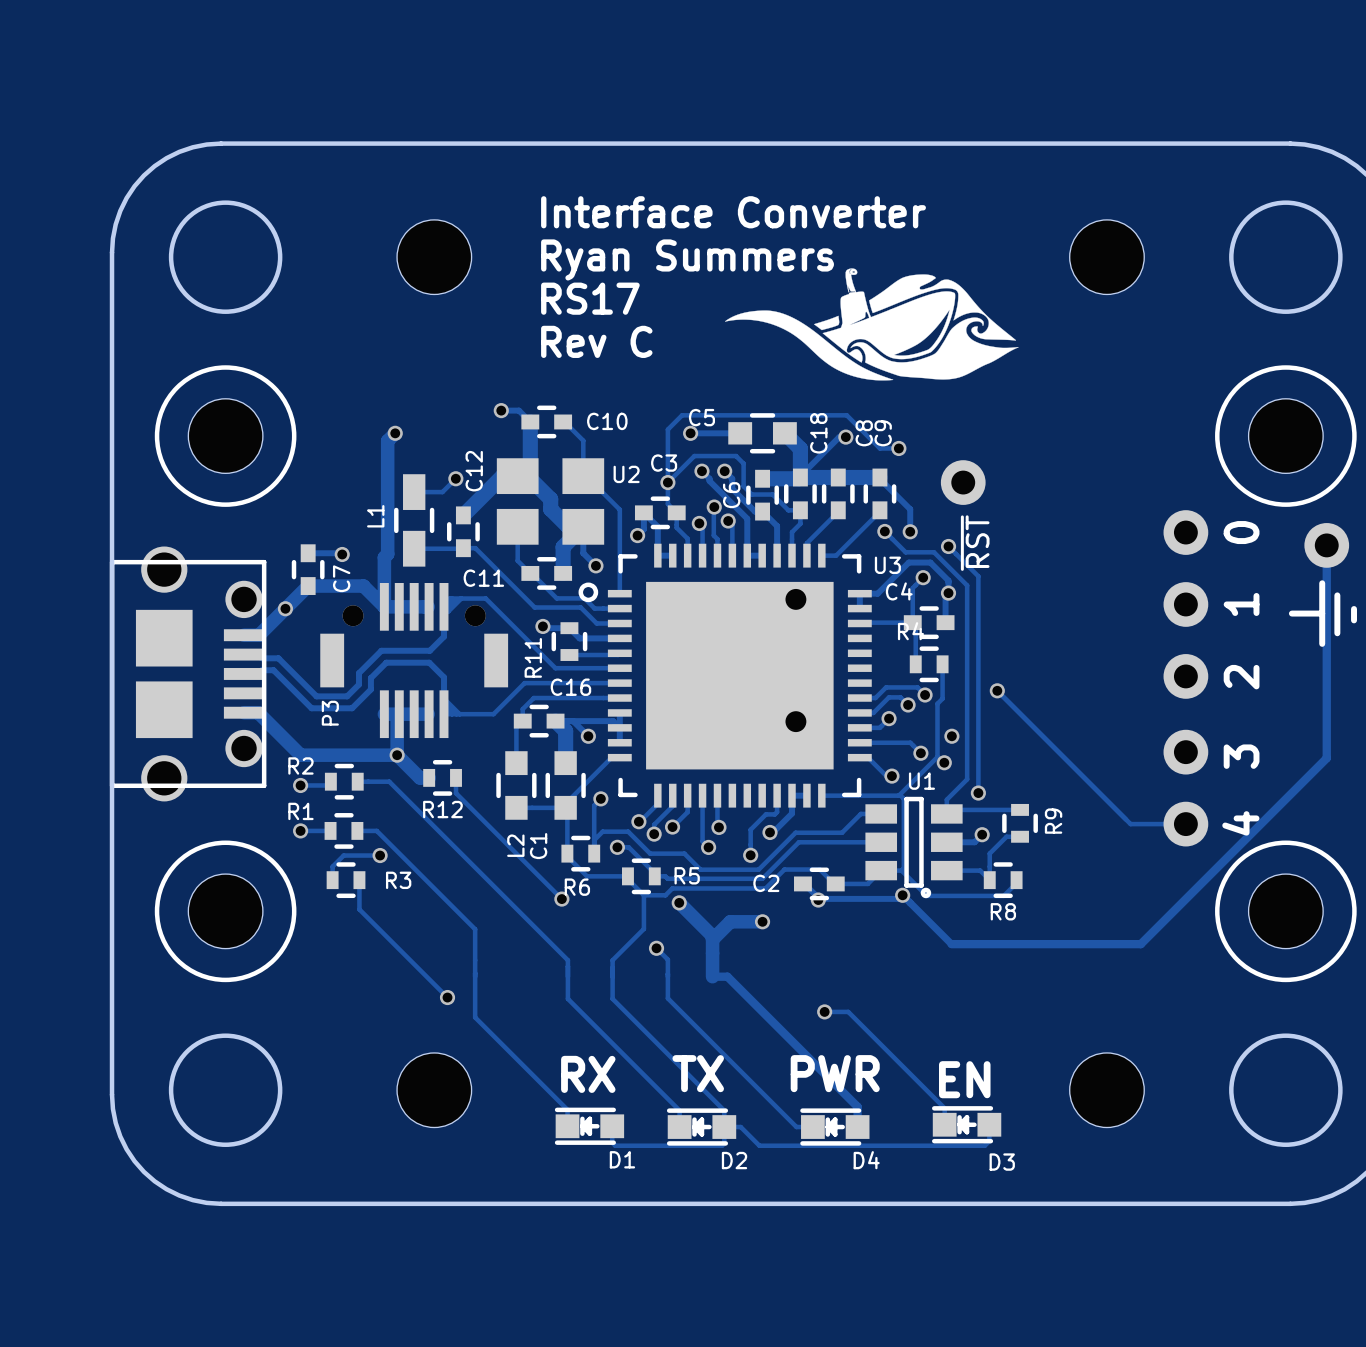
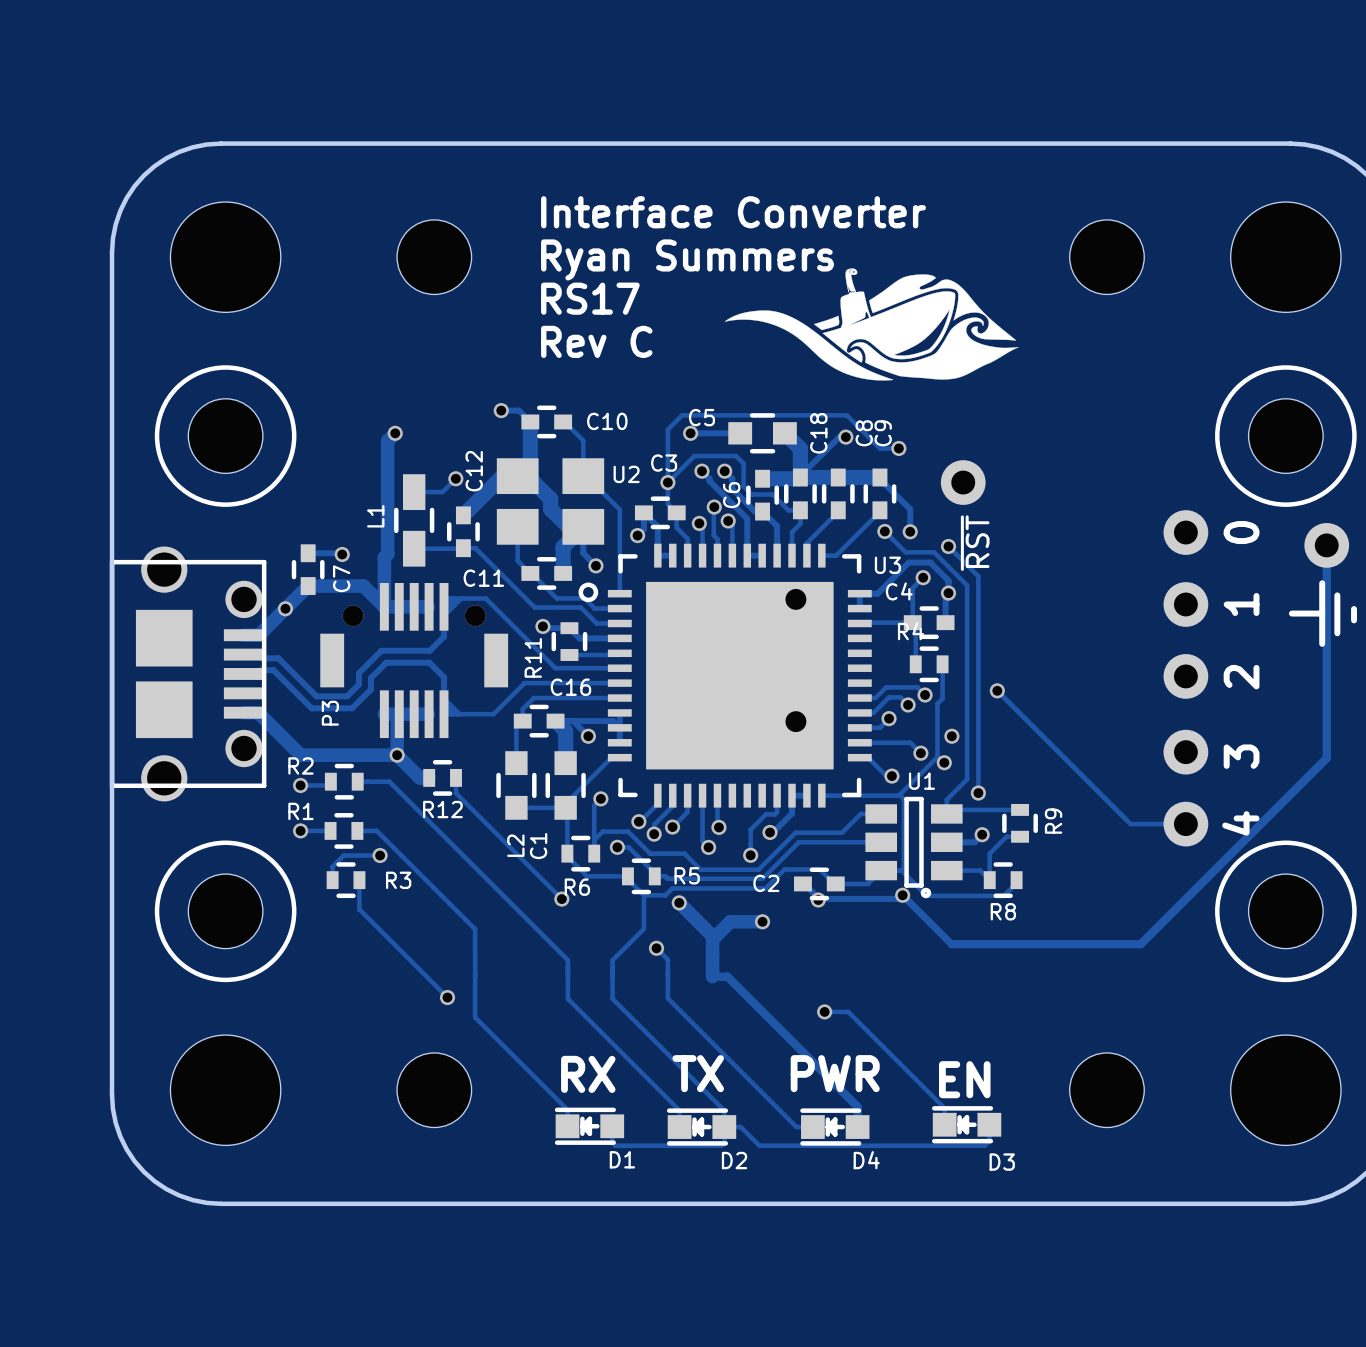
round board edge: [168, 200, 283, 314] -> none
round board edge: [1229, 200, 1343, 314] -> none
part: none -> (225, 257)
part: none -> (1285, 257)
round board edge: [168, 1033, 283, 1147] -> none
round board edge: [1229, 1033, 1343, 1147] -> none
part: none -> (225, 1090)
part: none -> (1285, 1090)

